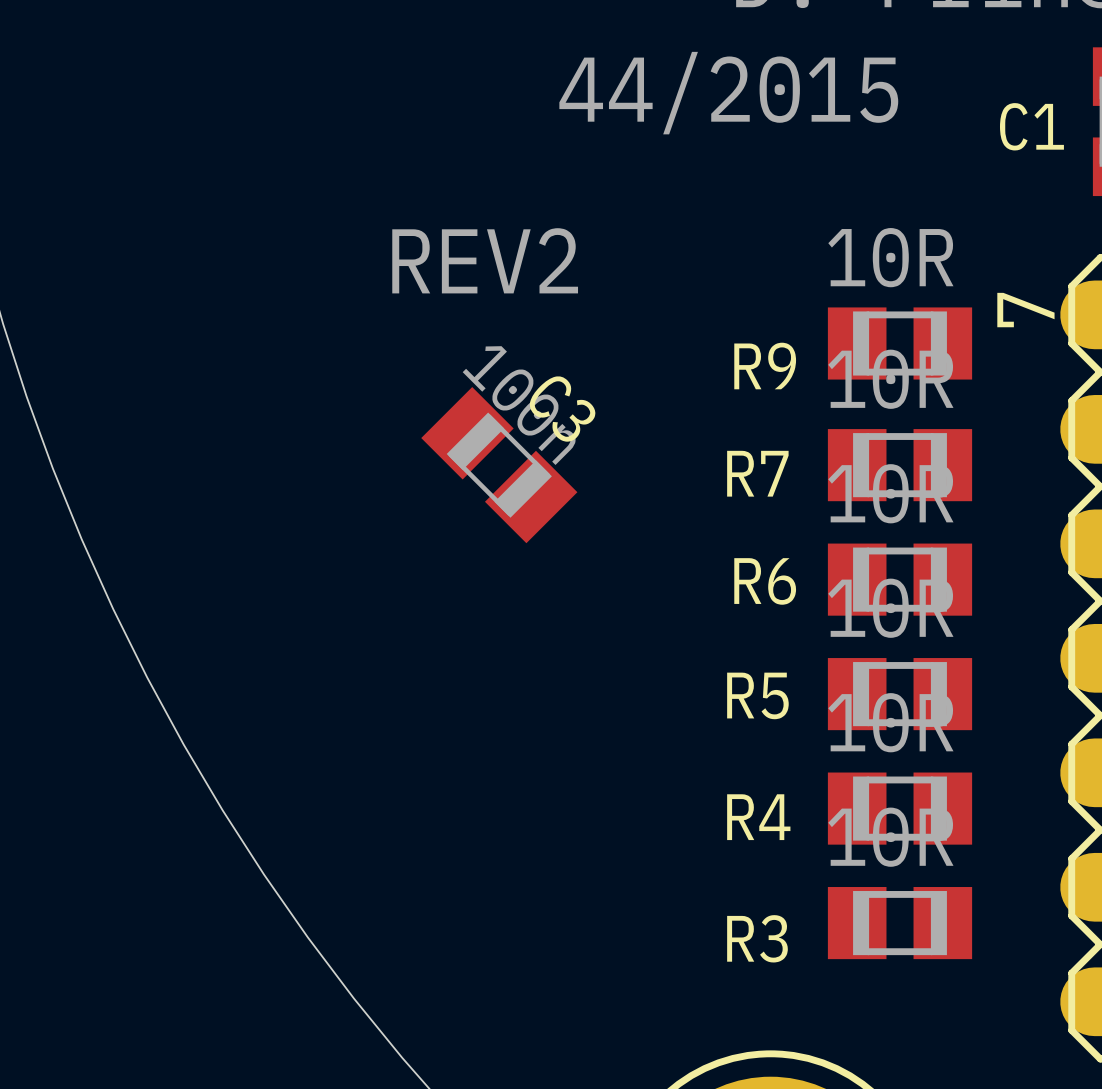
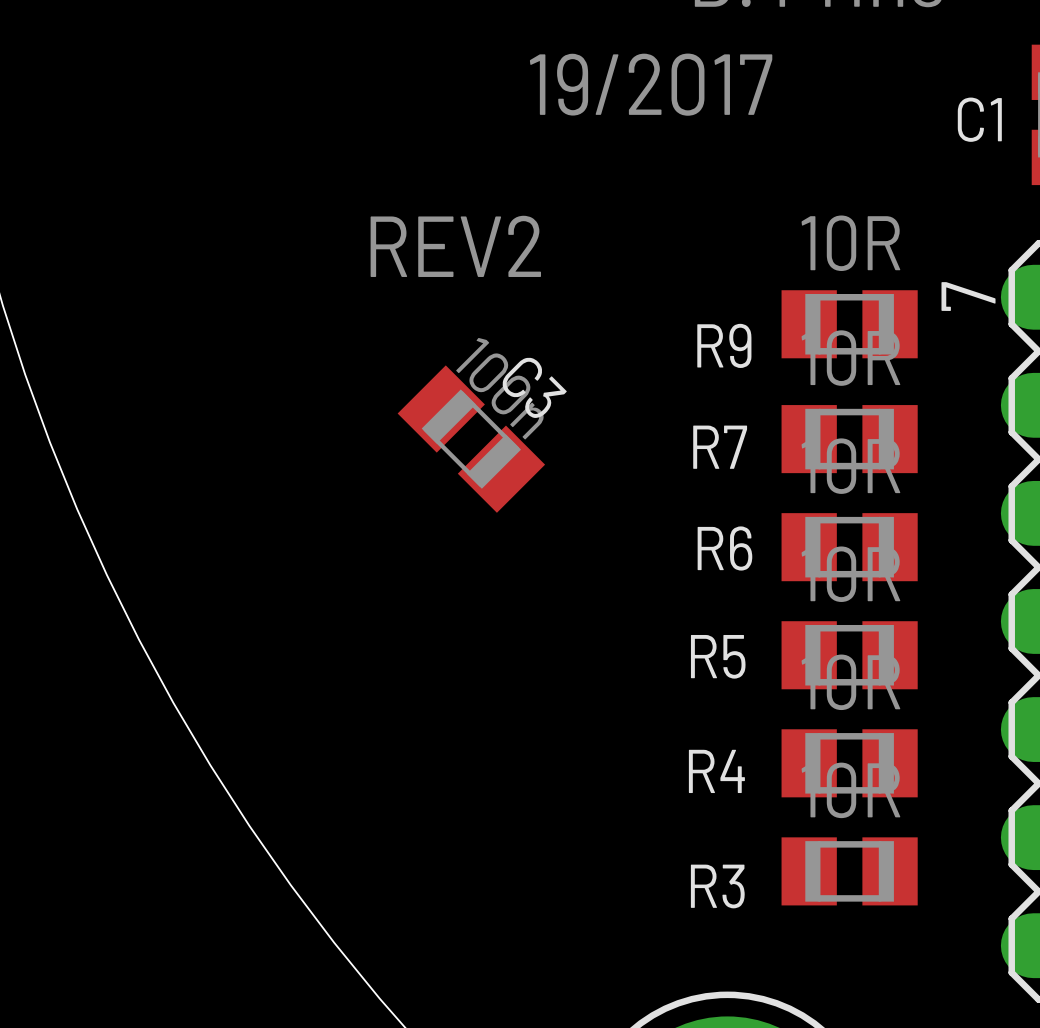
text: 44/2015 (728, 93) -> 19/2017 (651, 84)

